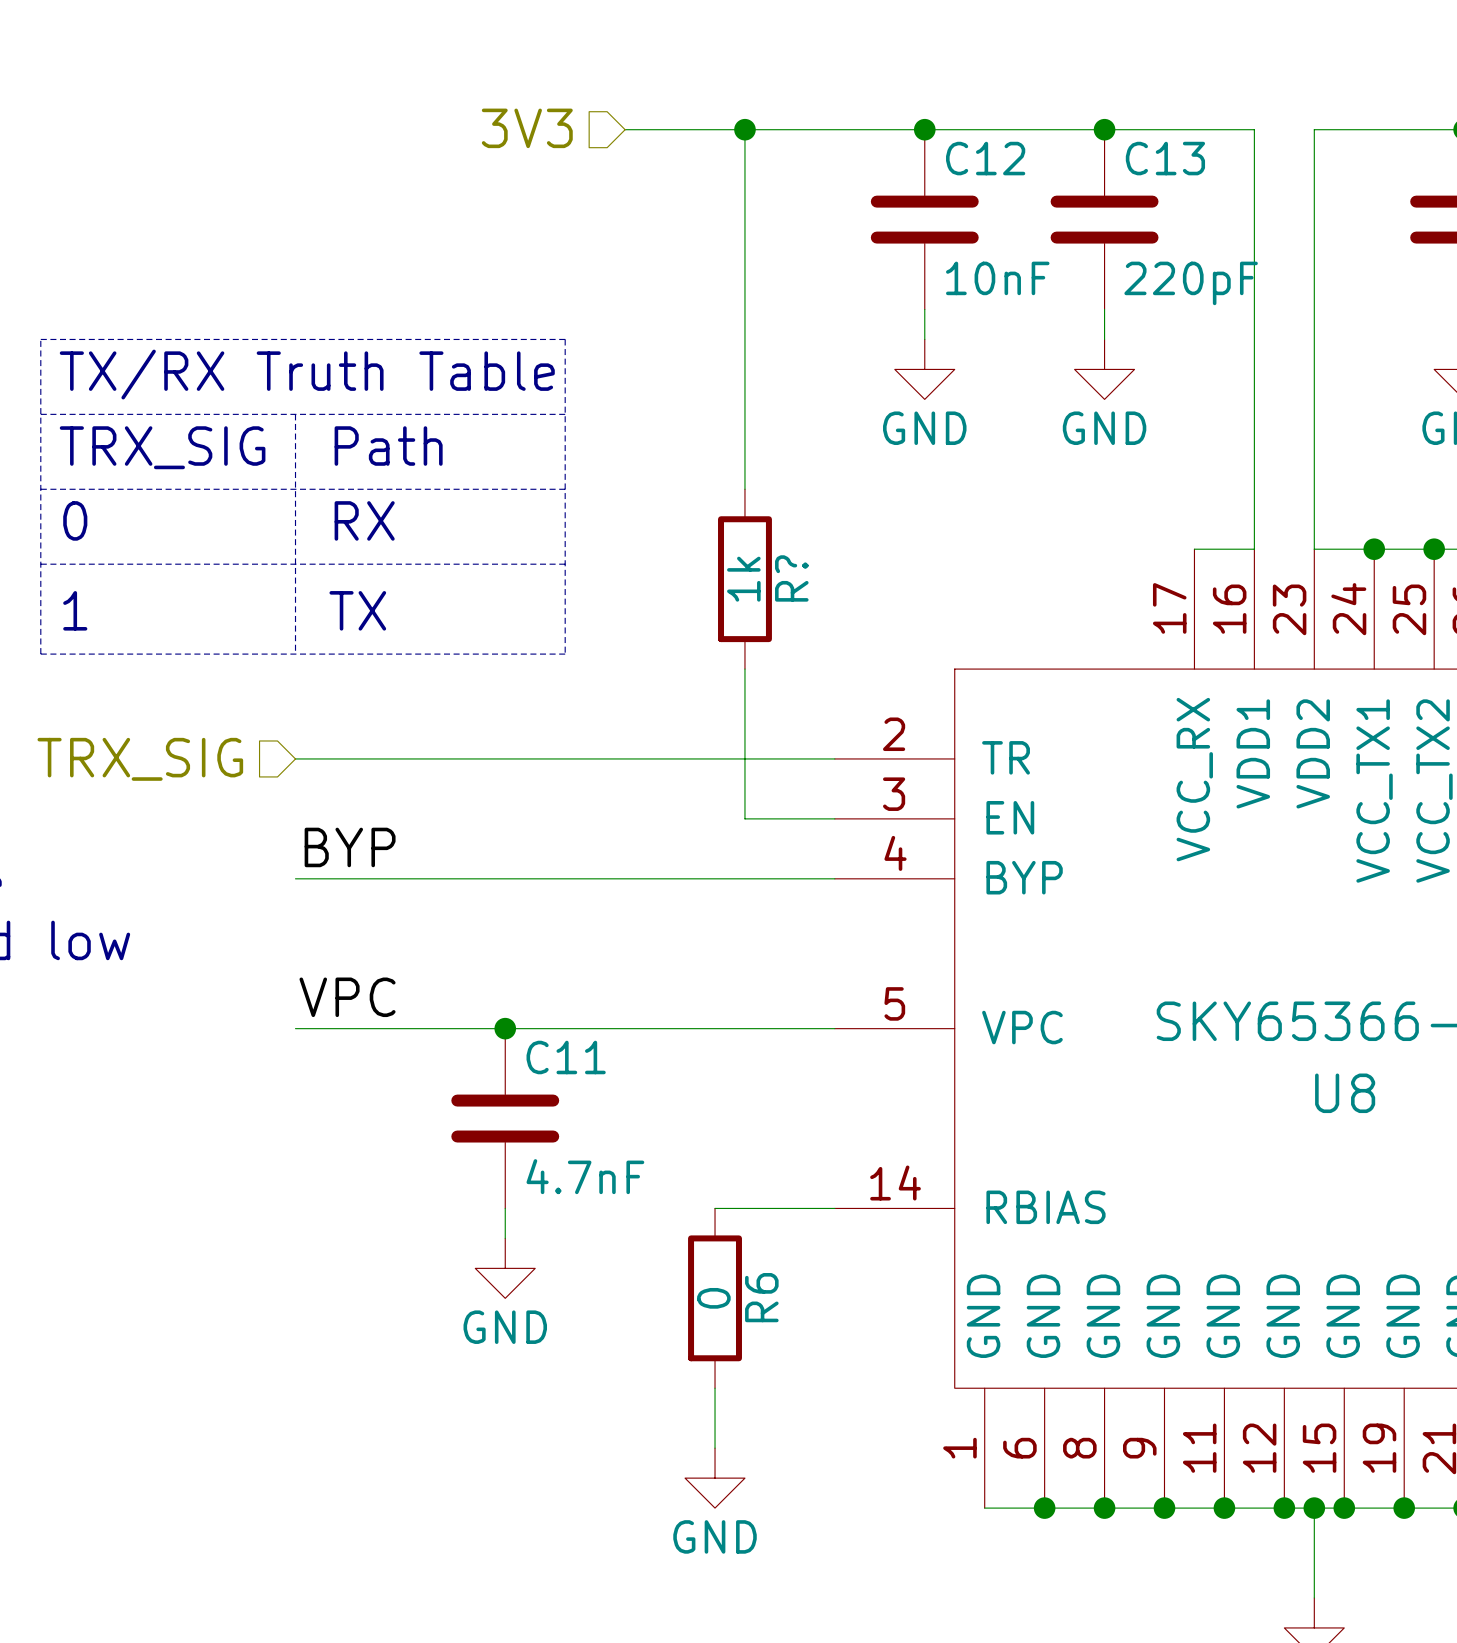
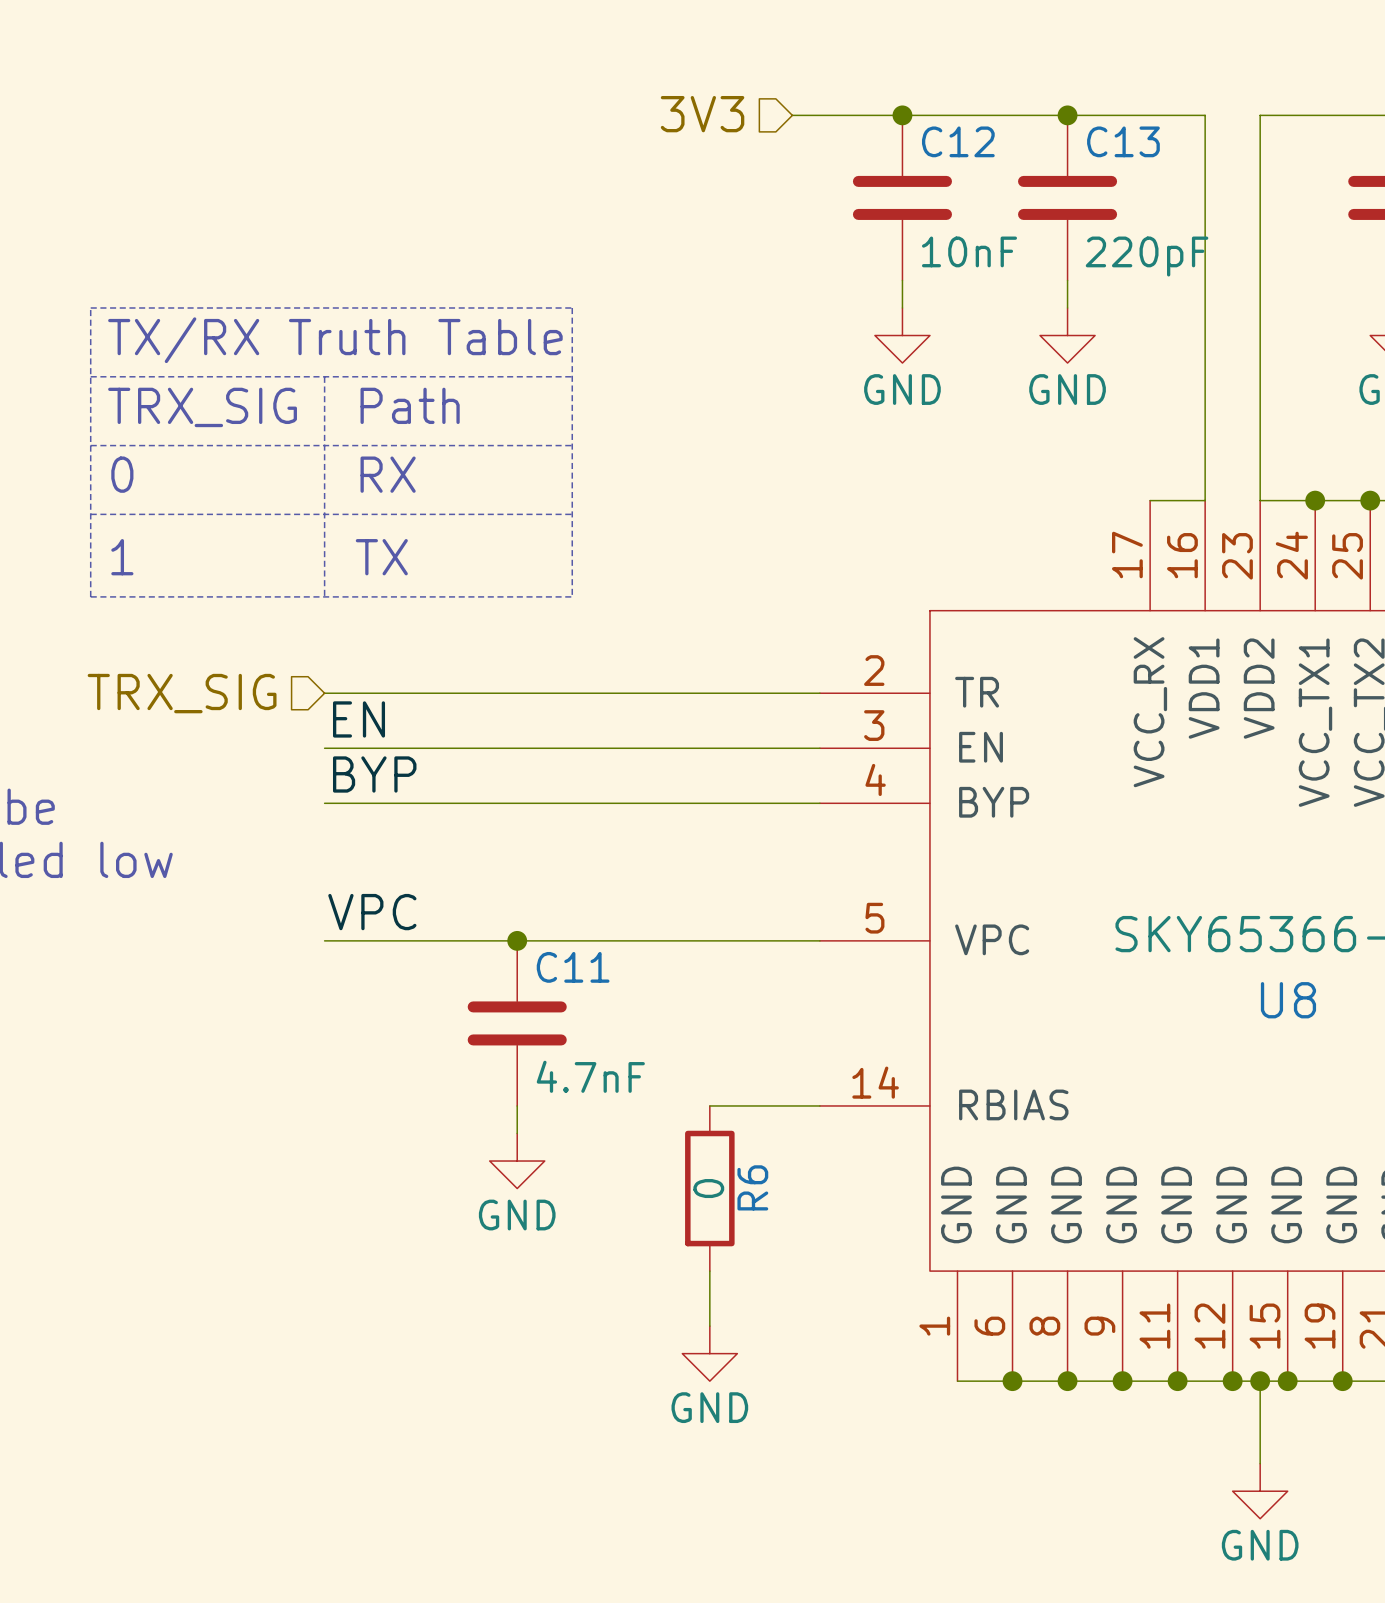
hierarchical label position: 3V3 (527, 128) -> 3V3 (702, 114)
wire: (625, 129) (804, 129) -> none
wire: (744, 129) (744, 489) -> none
junction: (744, 129) -> none
R?: 1k (744, 579) -> none
wire: (744, 669) (744, 818) -> (324, 748) (737, 748)
label: none -> EN (359, 719)

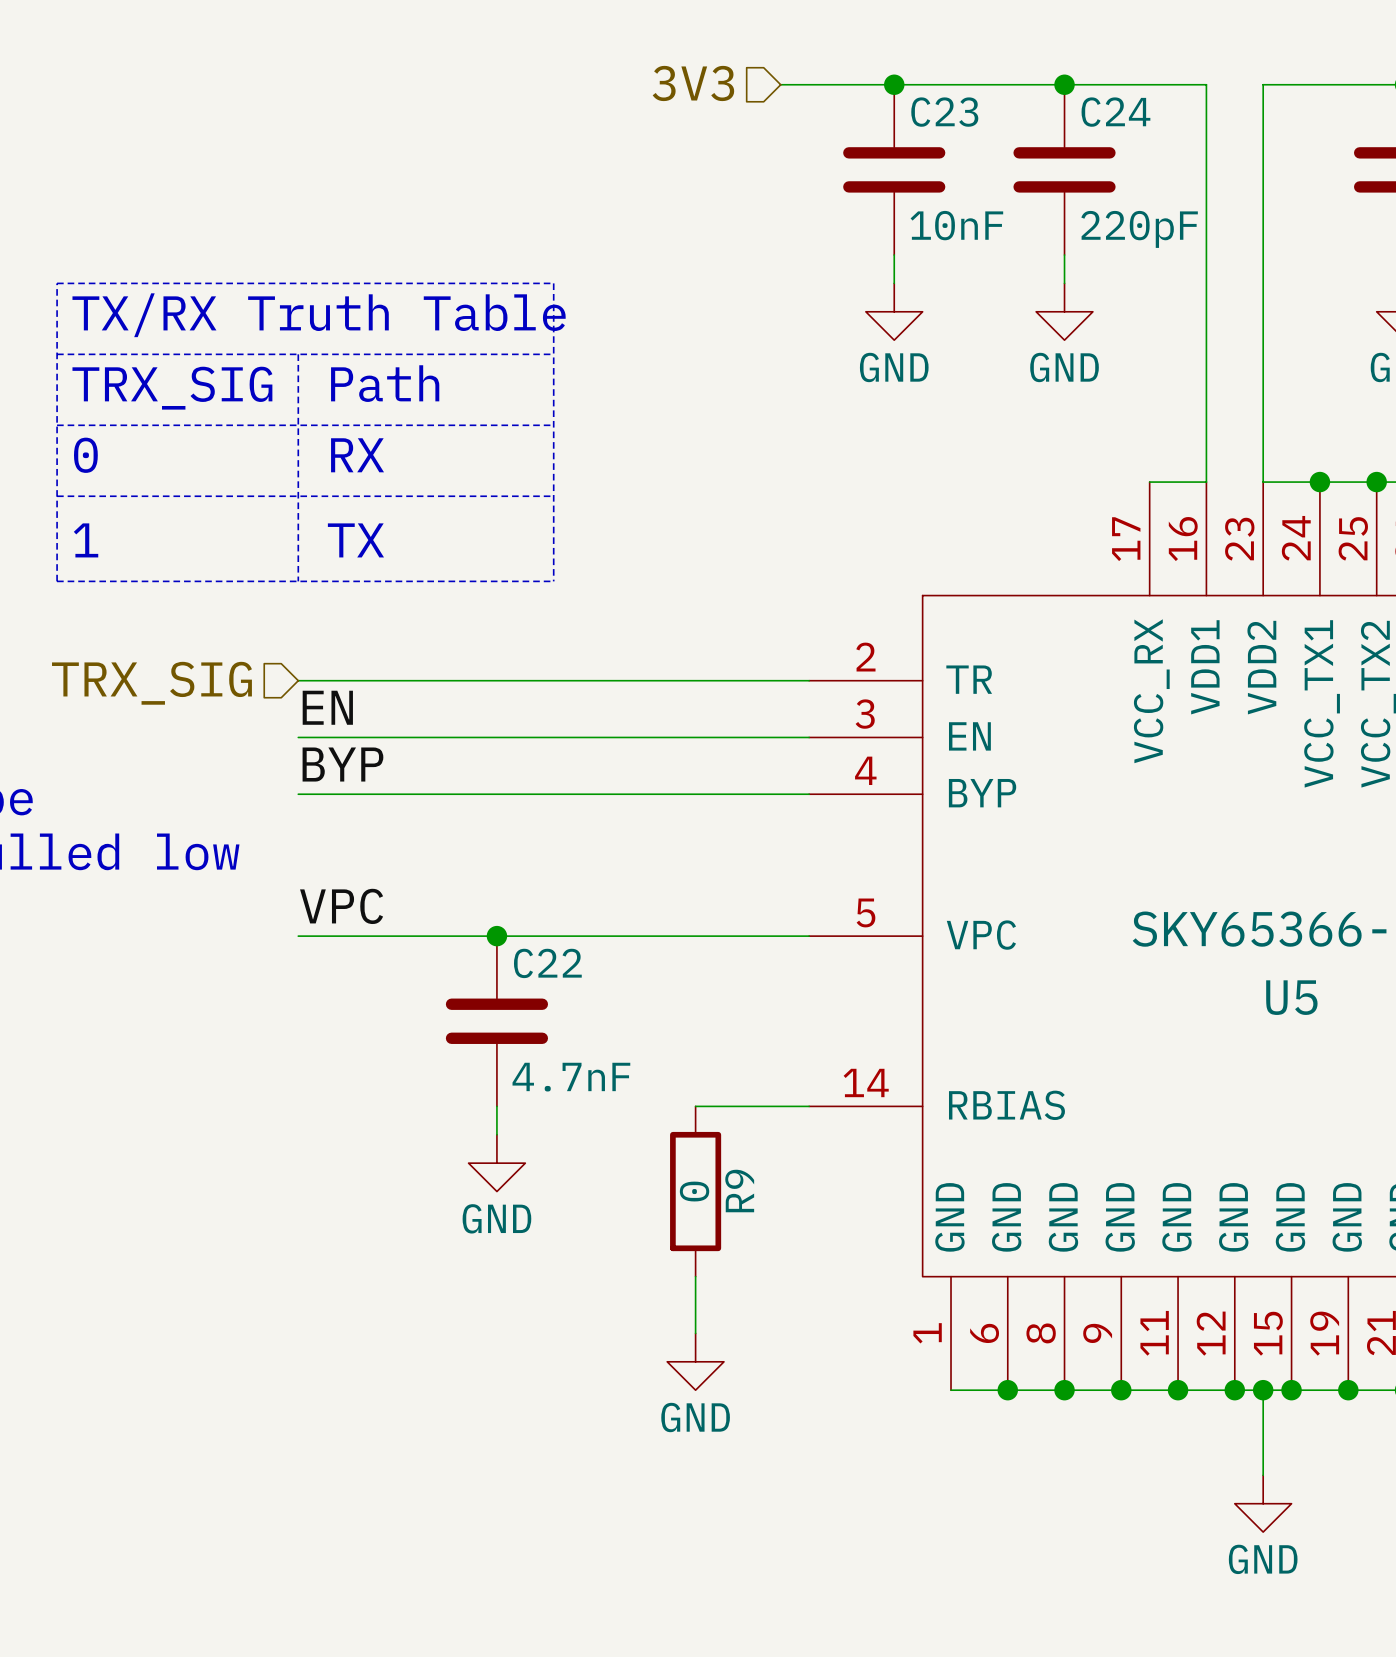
C12 name: C12 (958, 141) -> C23 (944, 112)
C13 name: C13 (1123, 141) -> C24 (1115, 112)
C11 name: C11 (573, 967) -> C22 (547, 963)
U8 name: U8 (1288, 1000) -> U5 (1291, 997)
R6 name: R6 (752, 1187) -> R9 (739, 1191)

